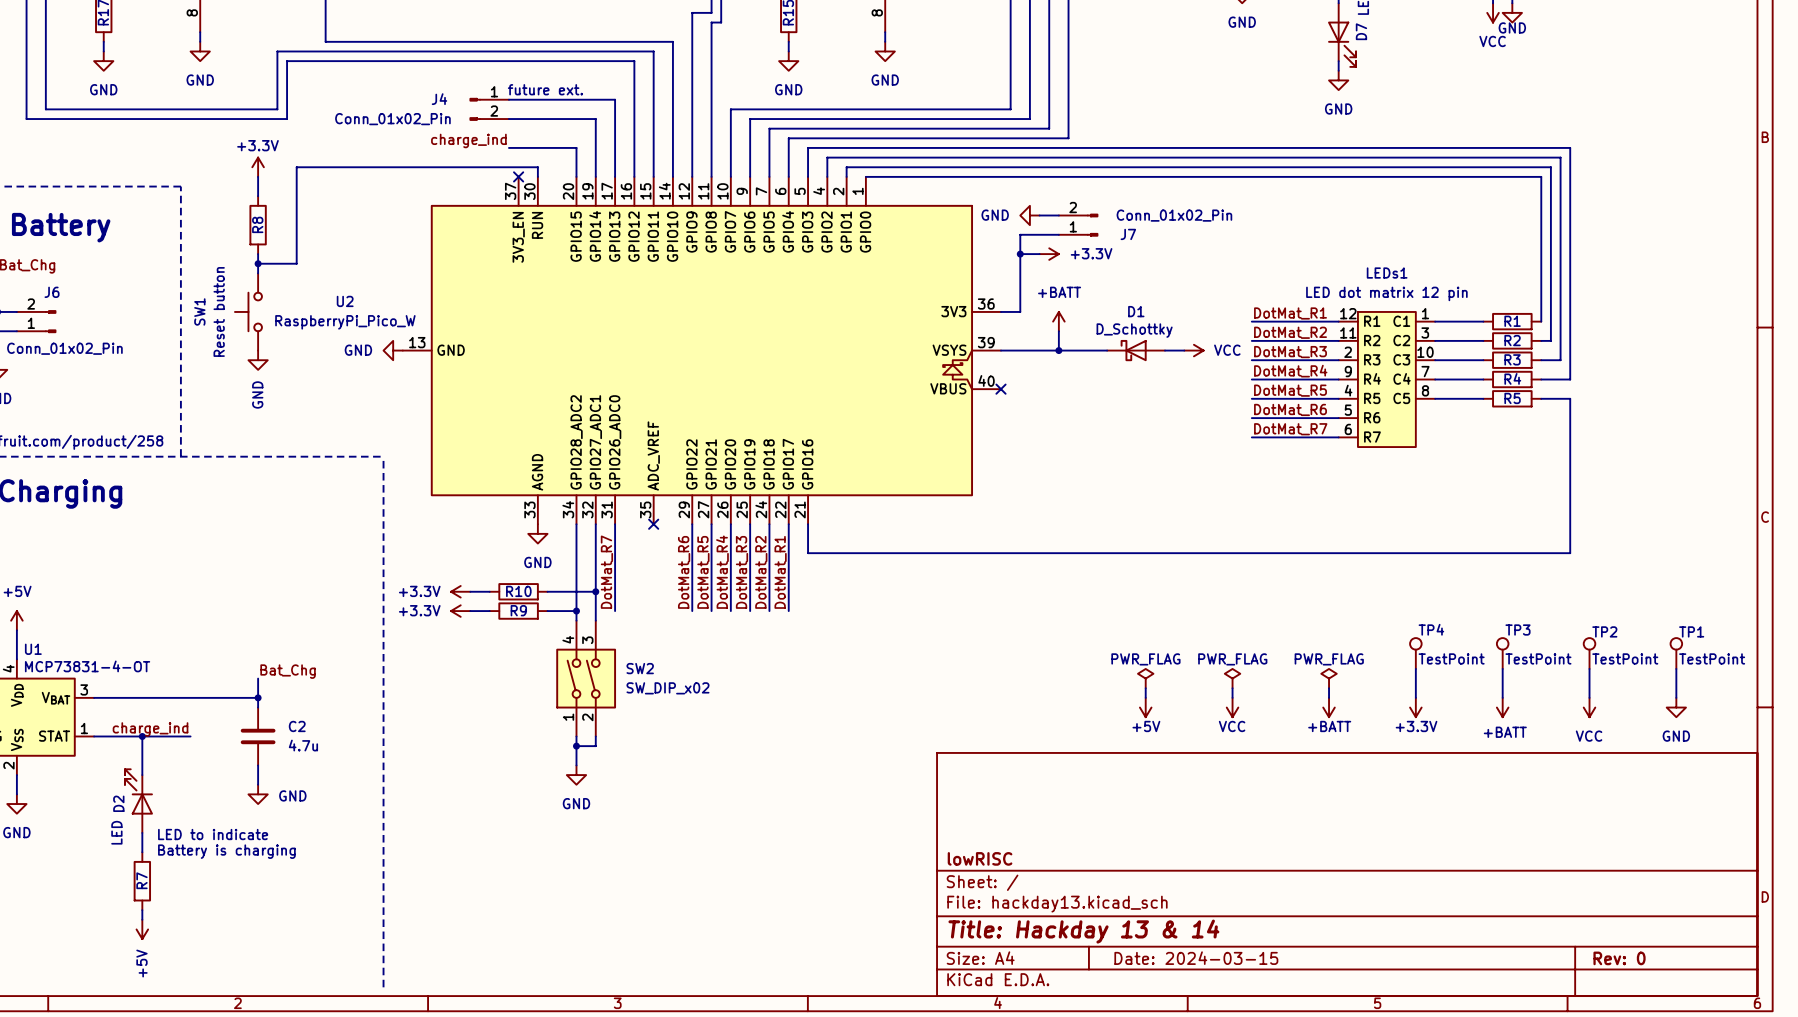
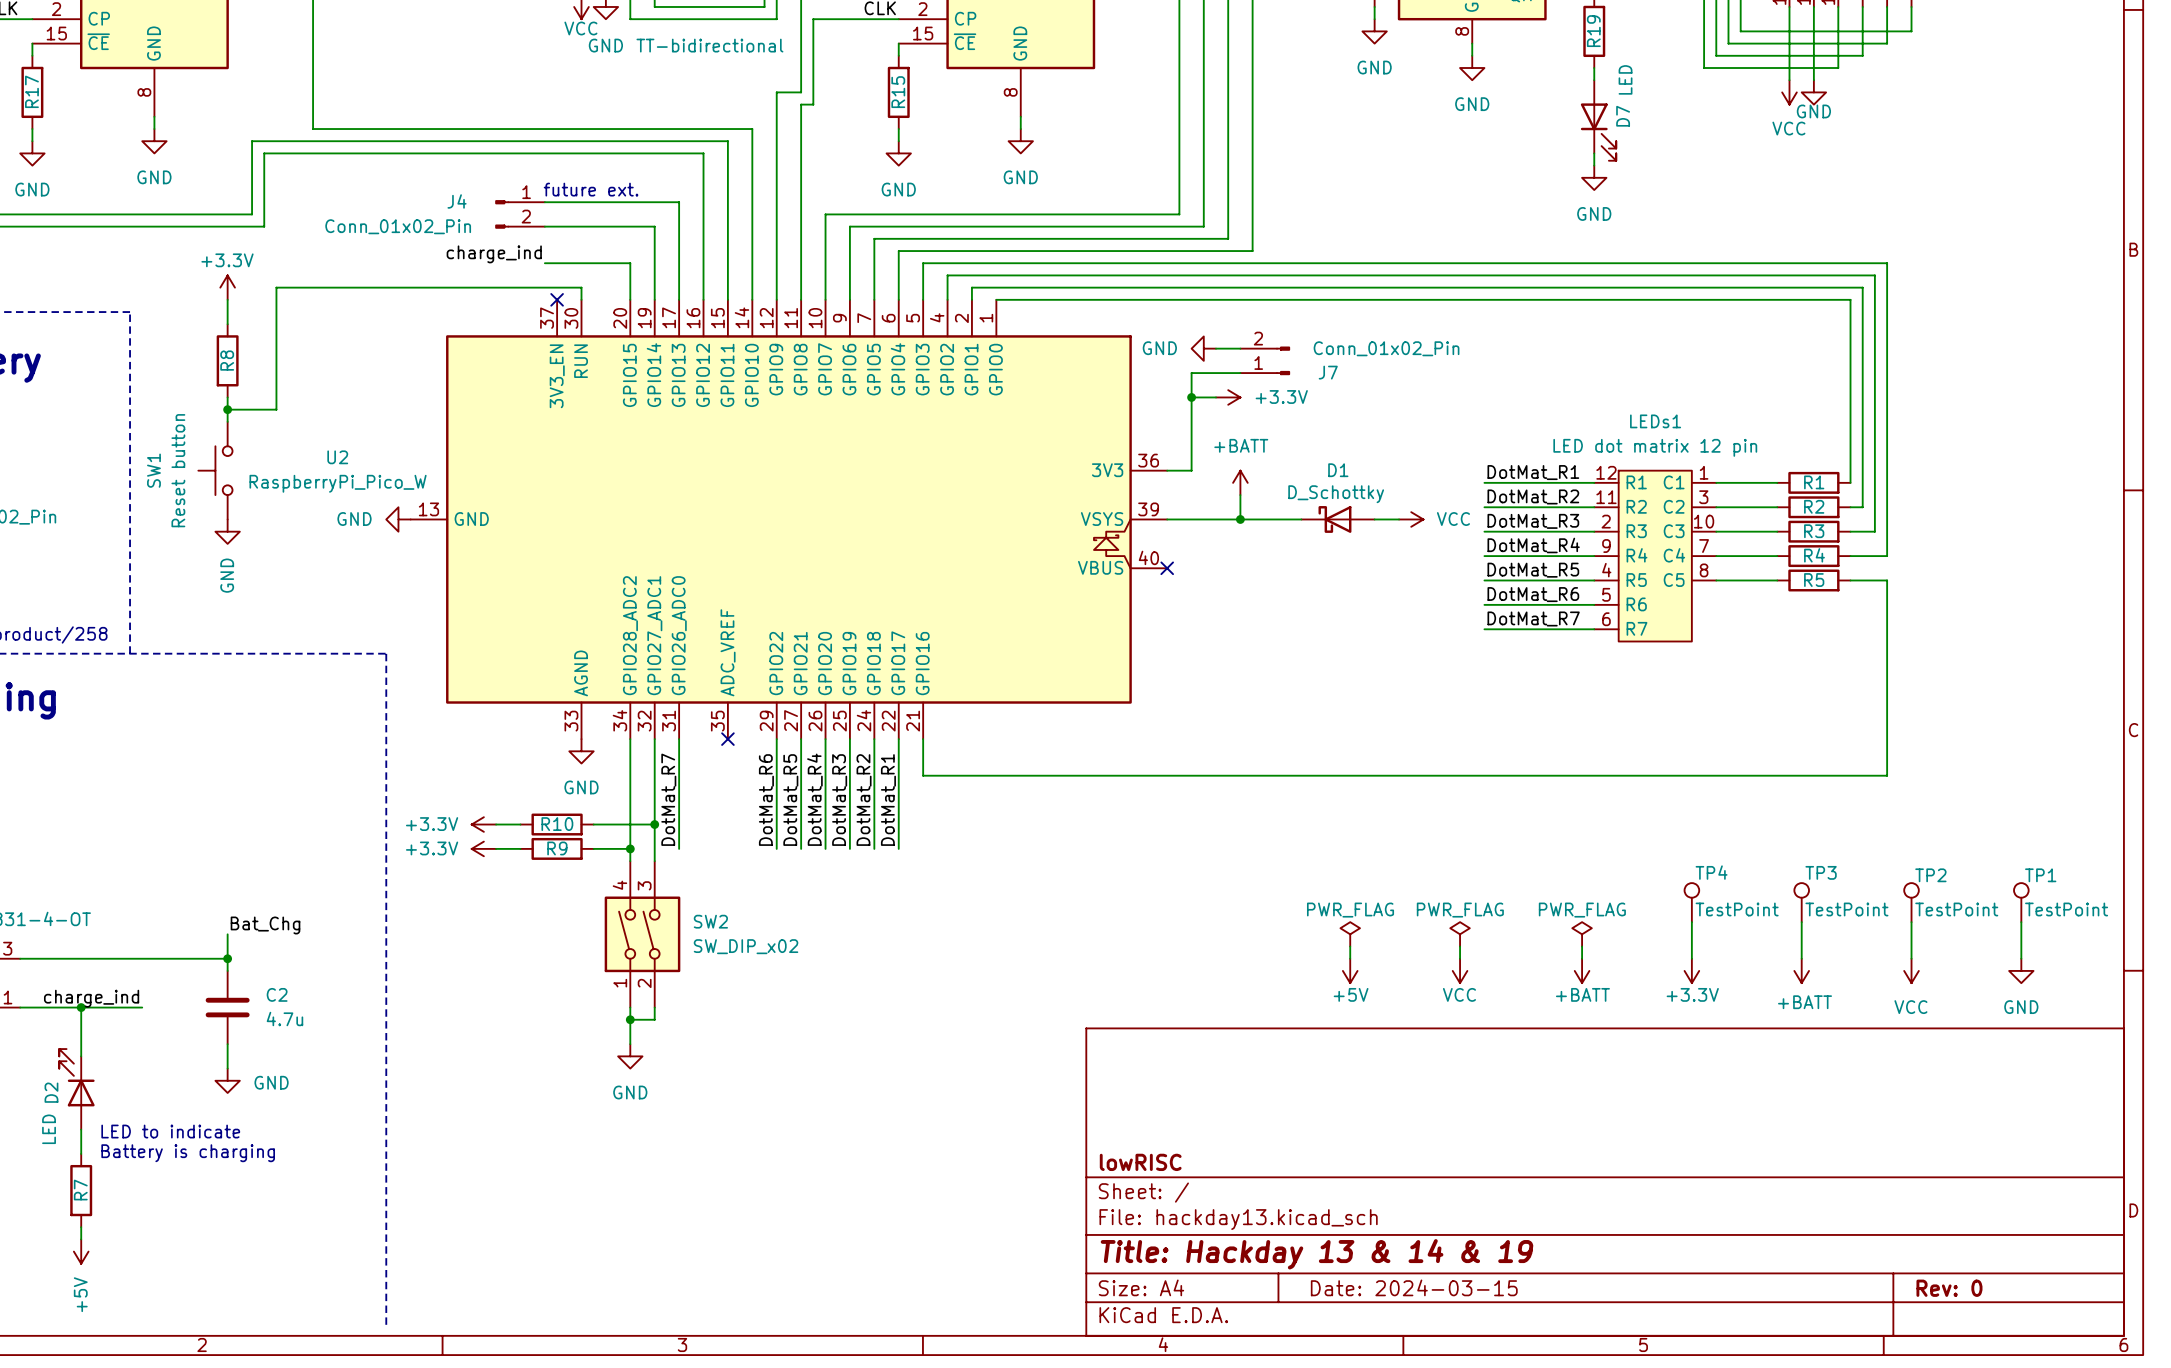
title block: Title: Hackday 13 & 14 (1083, 931) -> Title: Hackday 13 & 14 & 19 (1317, 1254)

